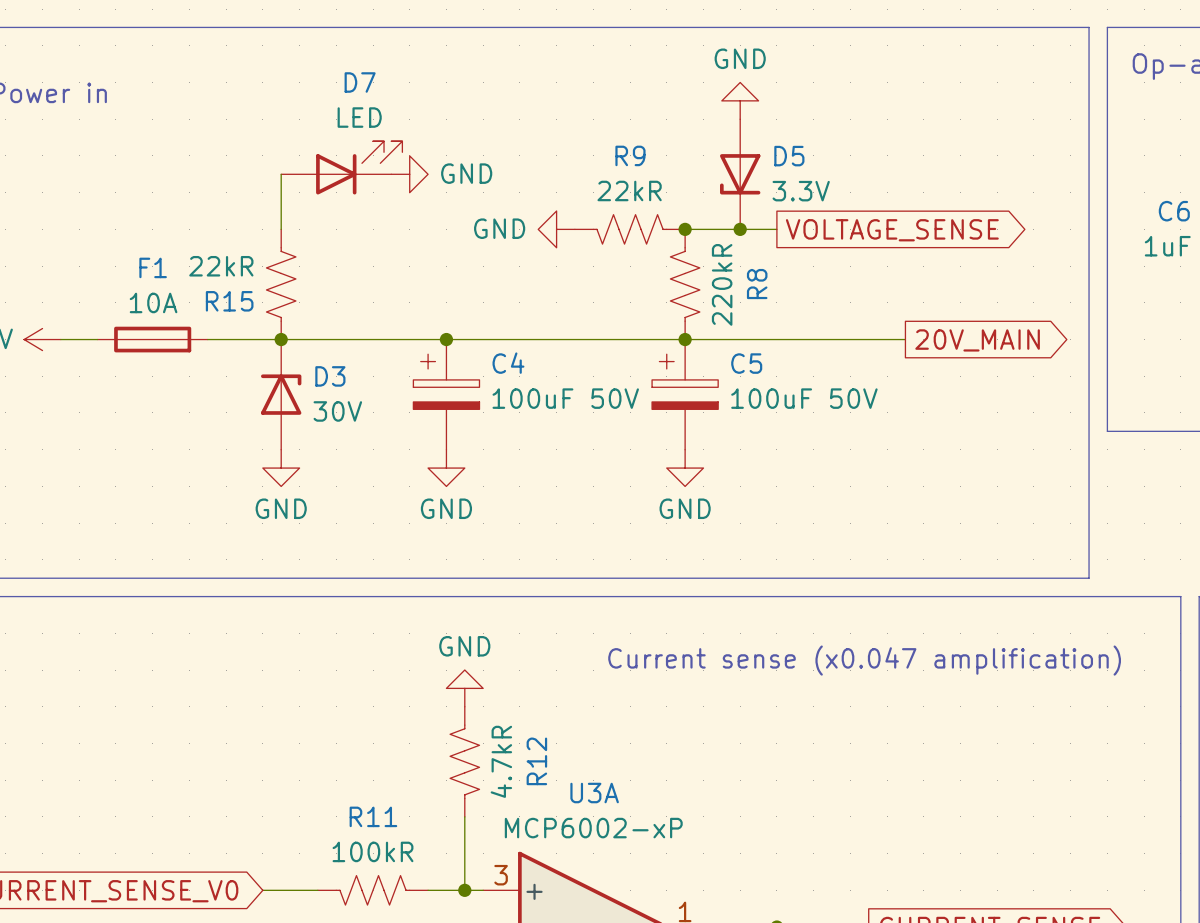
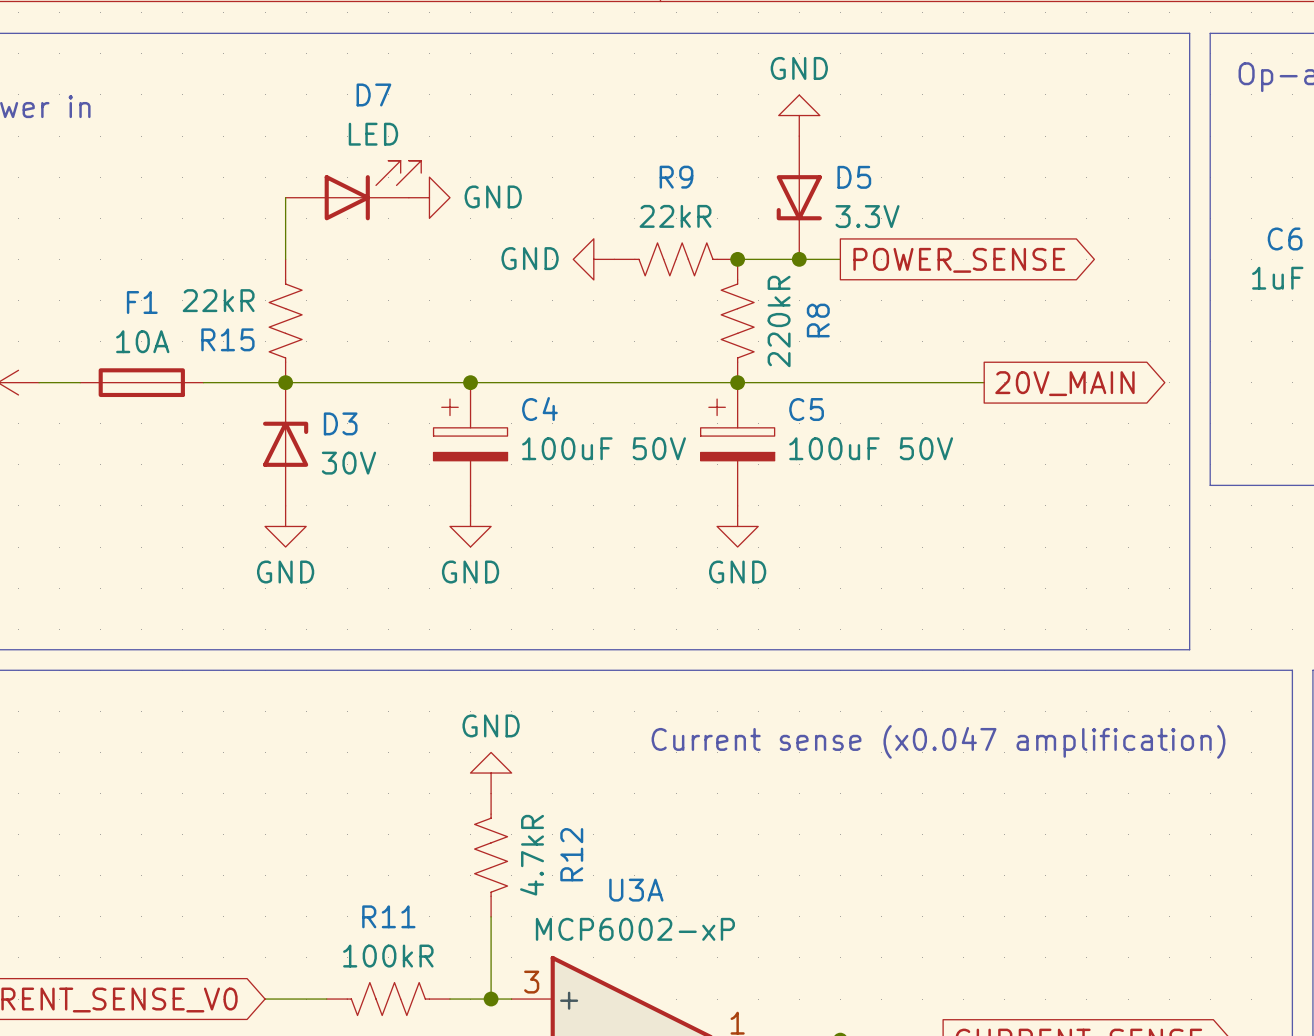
global label: VOLTAGE_SENSE (892, 230) -> POWER_SENSE (959, 260)

